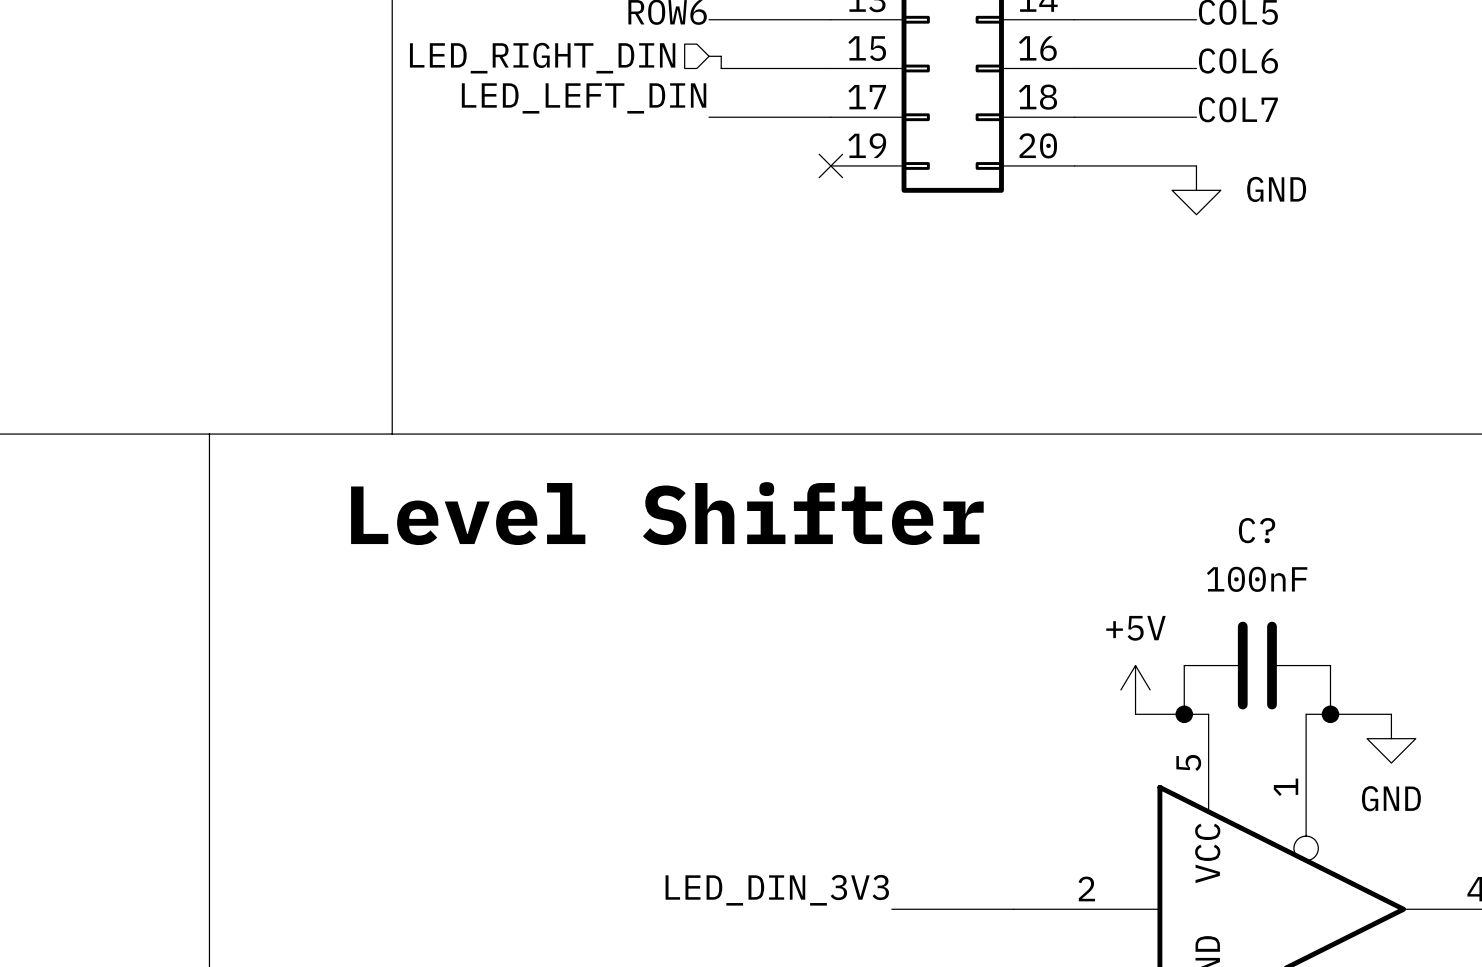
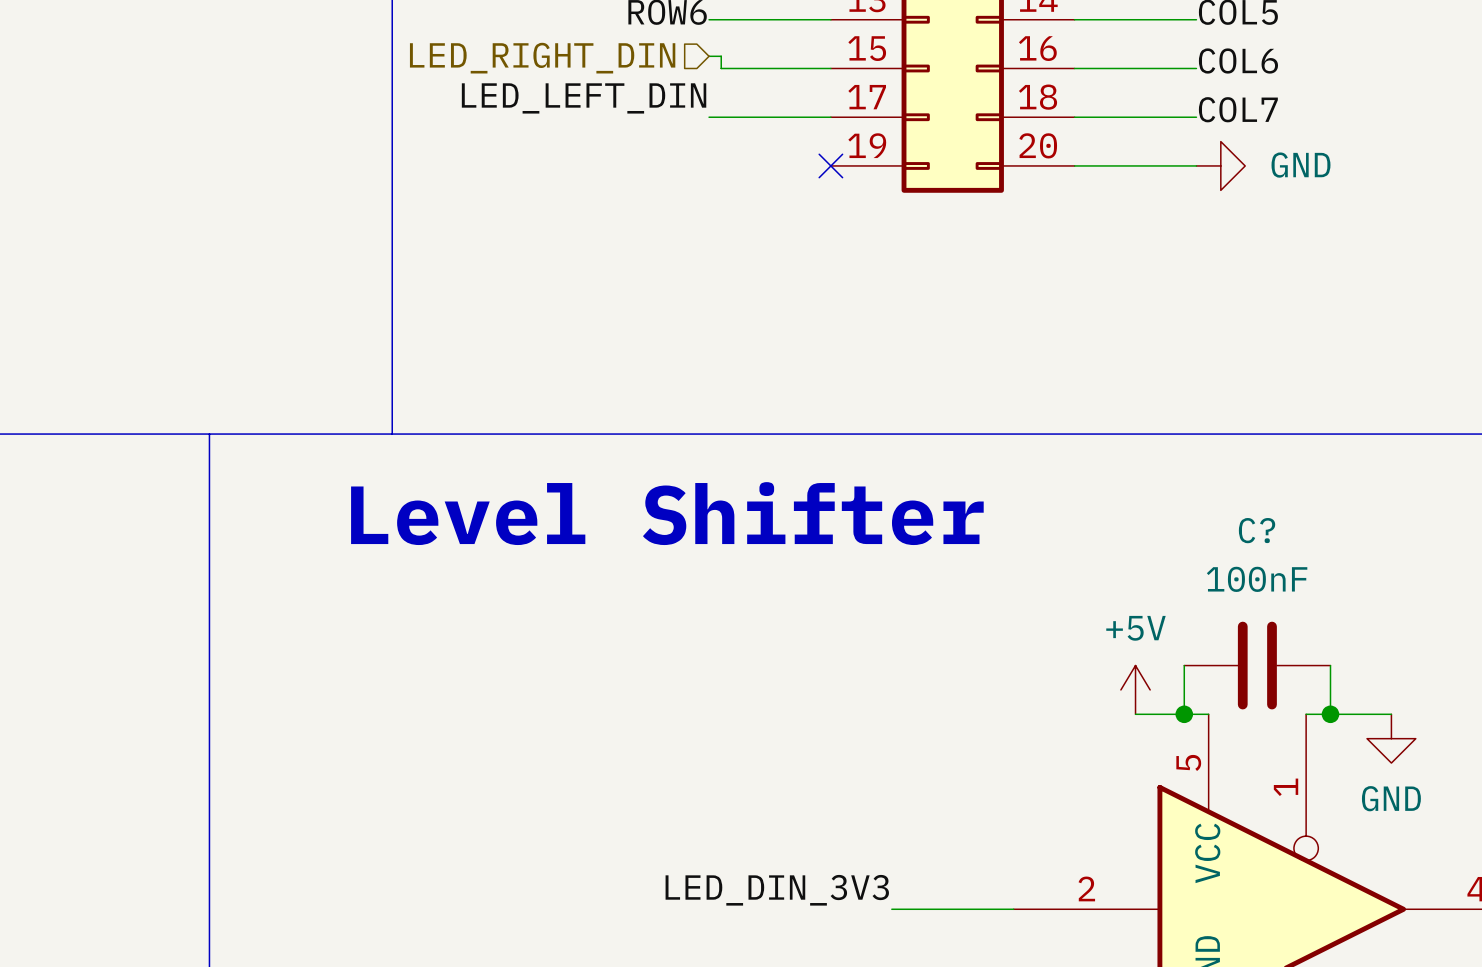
power symbol rotation: 0° (1196, 190) -> 90° counterclockwise (1220, 165)
power symbol position: GND (1196, 190) -> GND (1220, 165)

